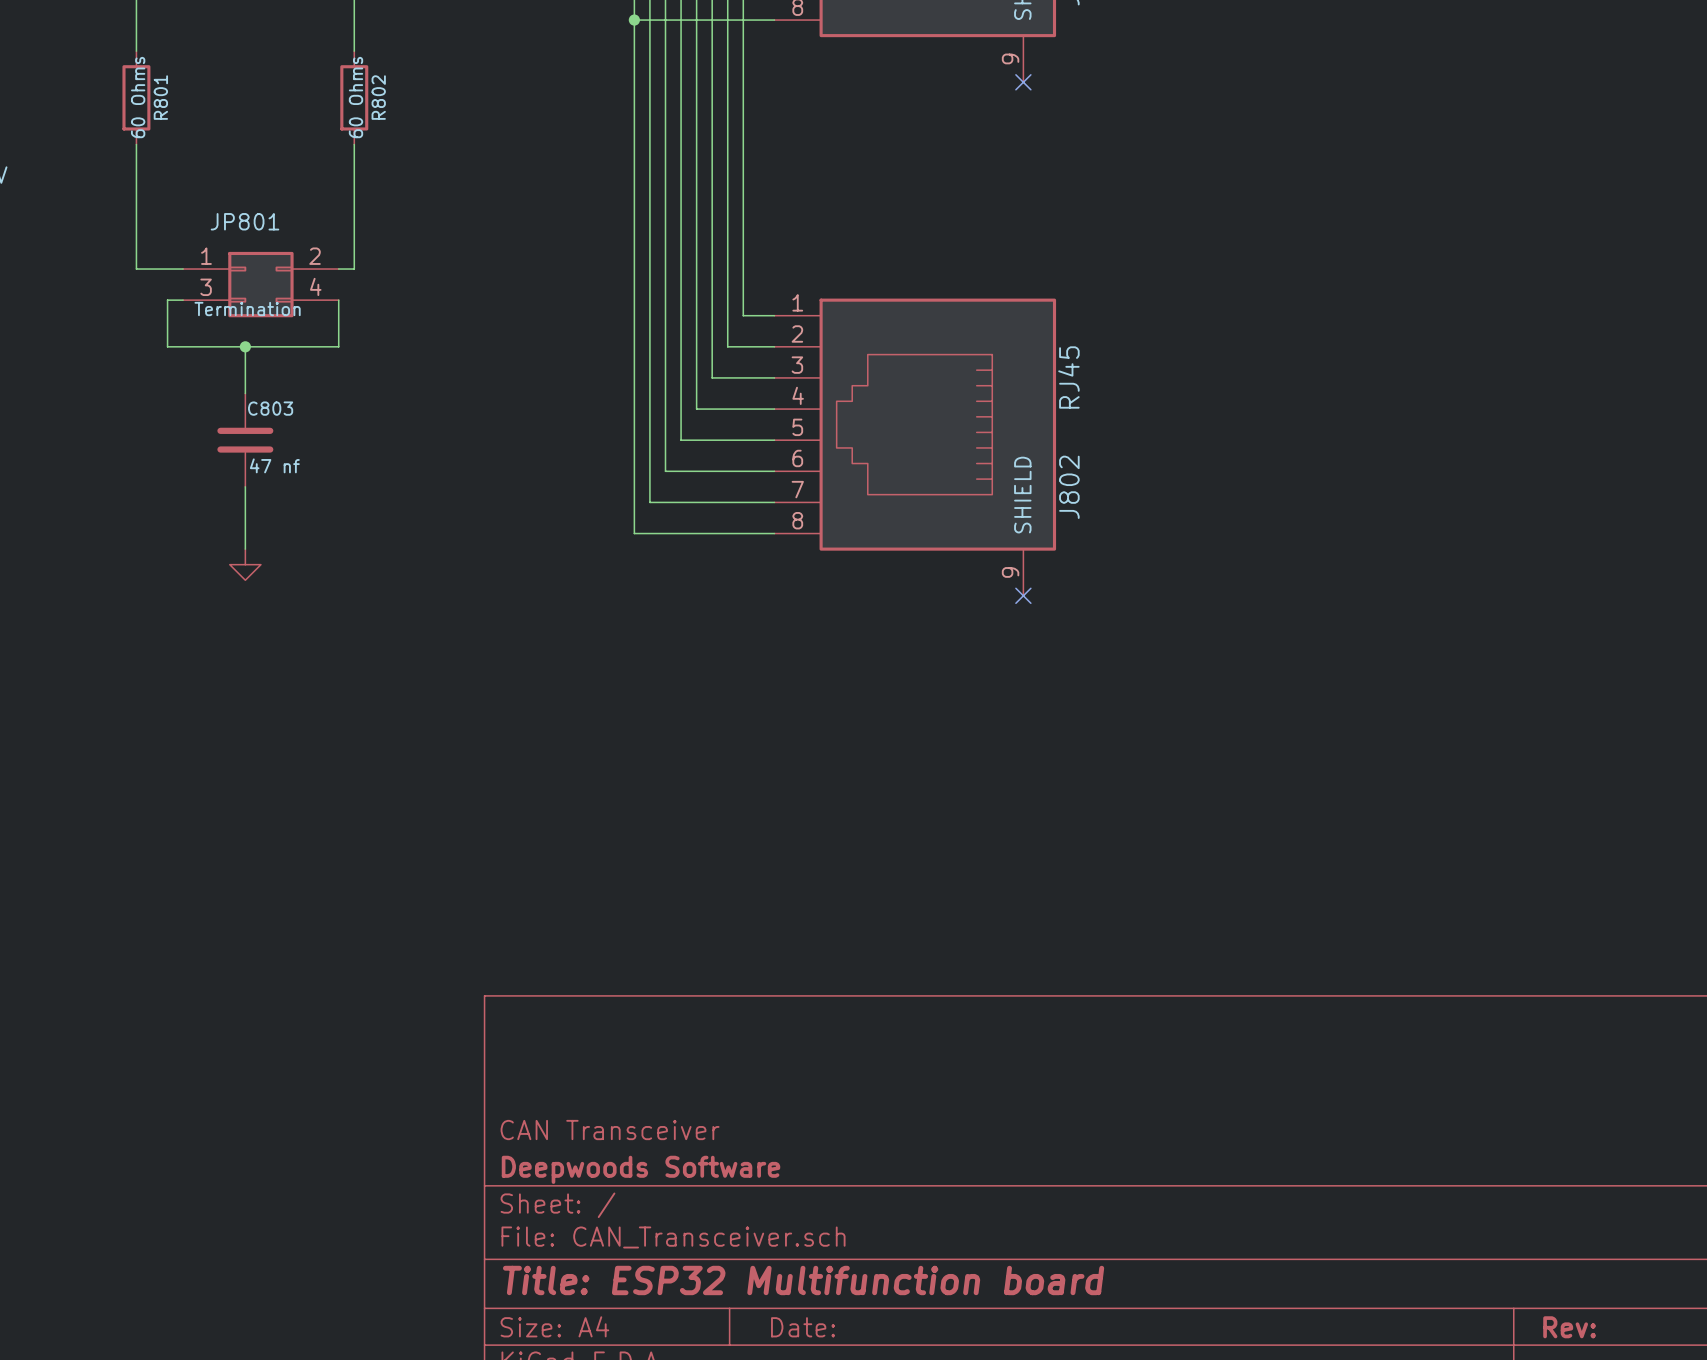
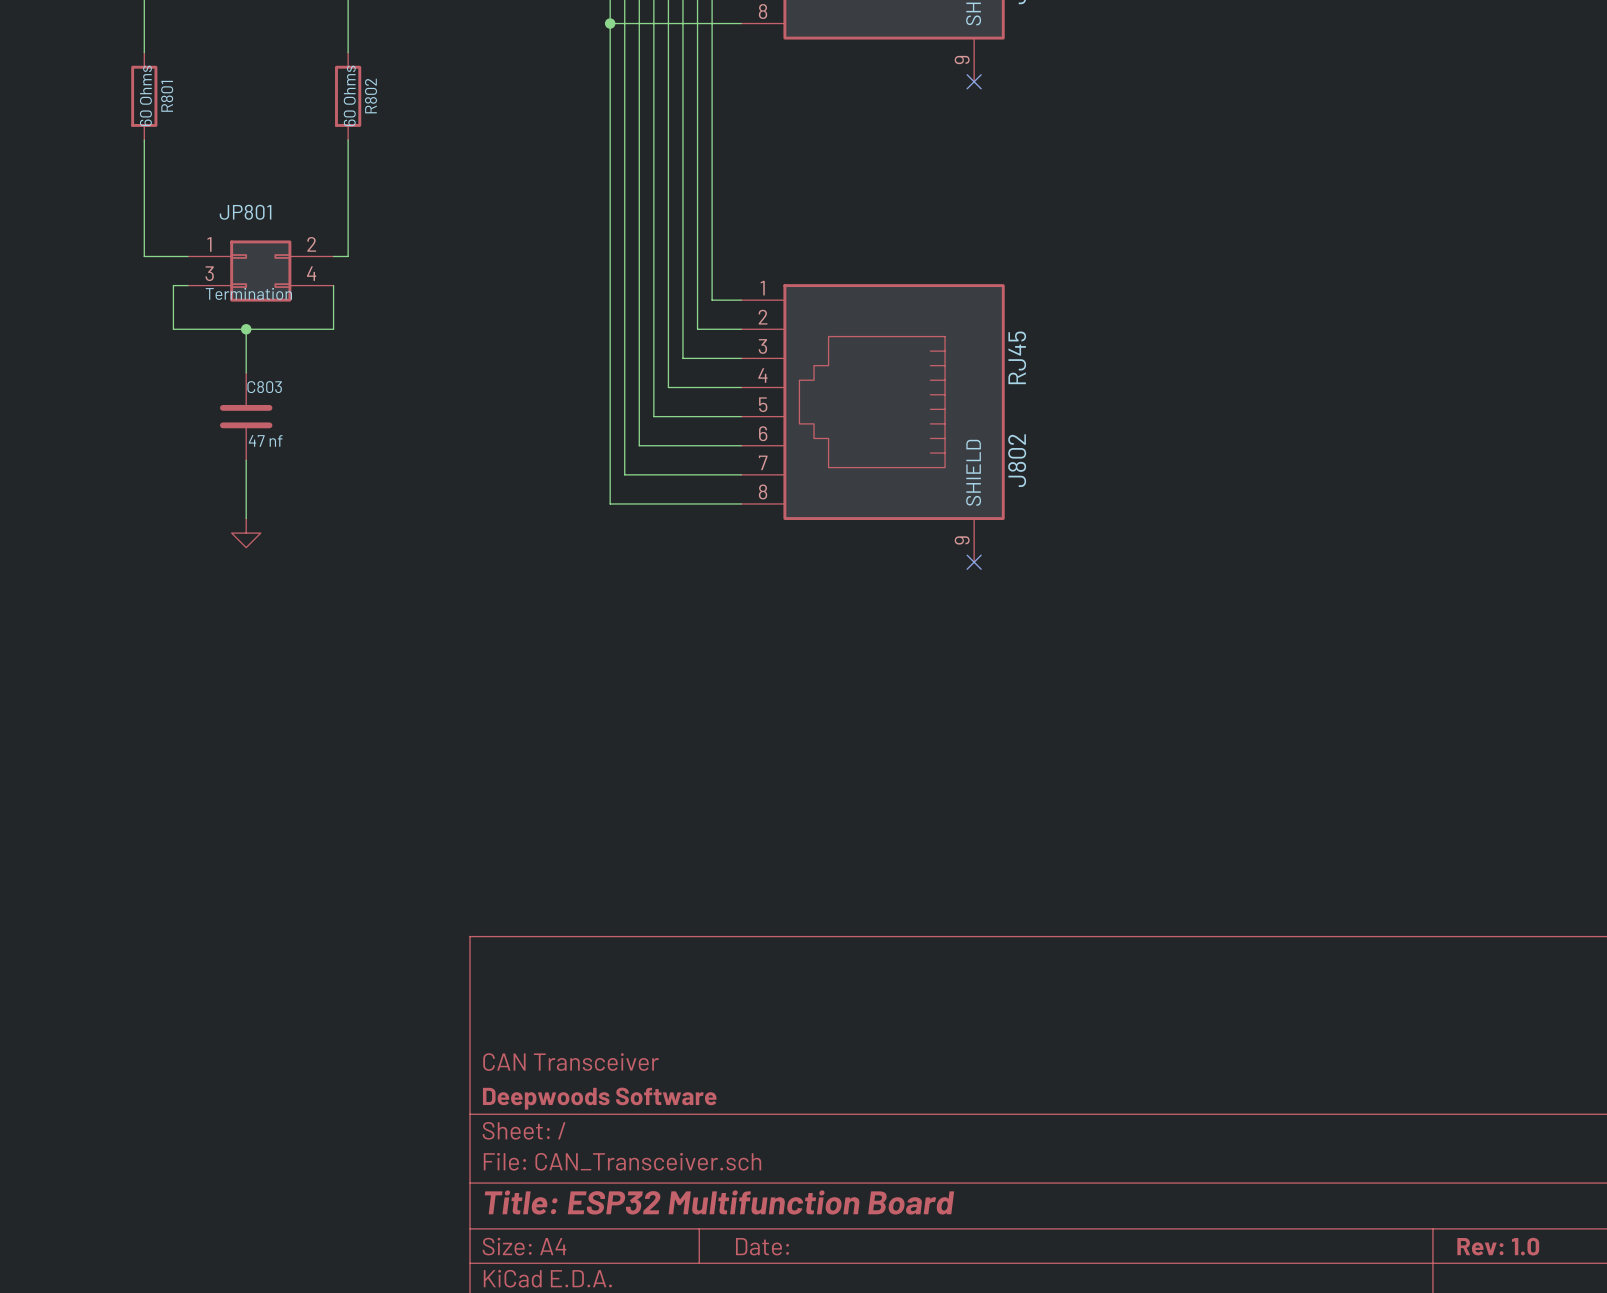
title block: Title: ESP32 Multifunction board (803, 1280) -> Title: ESP32 Multifunction Board (719, 1202)
title block: Rev: (1569, 1327) -> Rev: 1.0 (1498, 1246)

